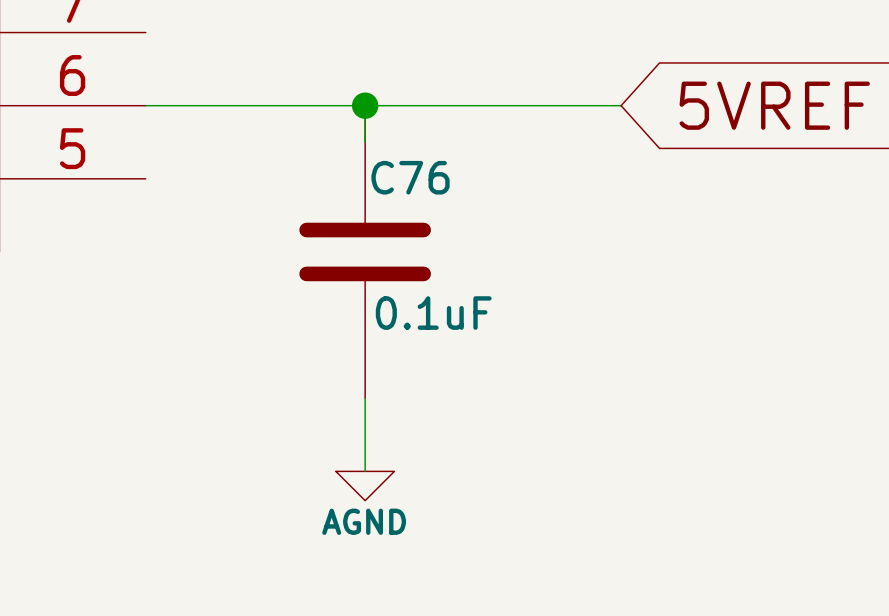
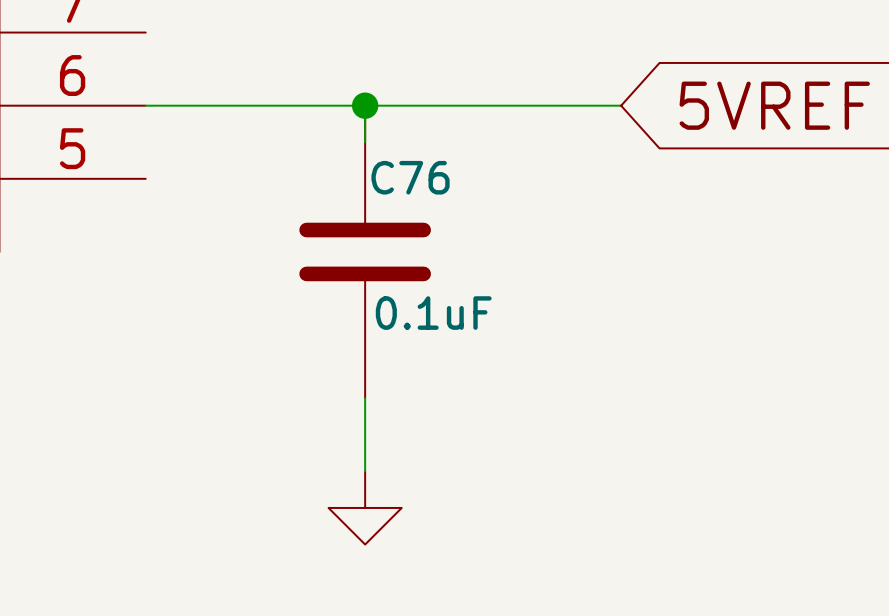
power symbol shape: [335, 471, 395, 501] -> [328, 471, 402, 545]
power symbol text: AGND (364, 521) -> none

